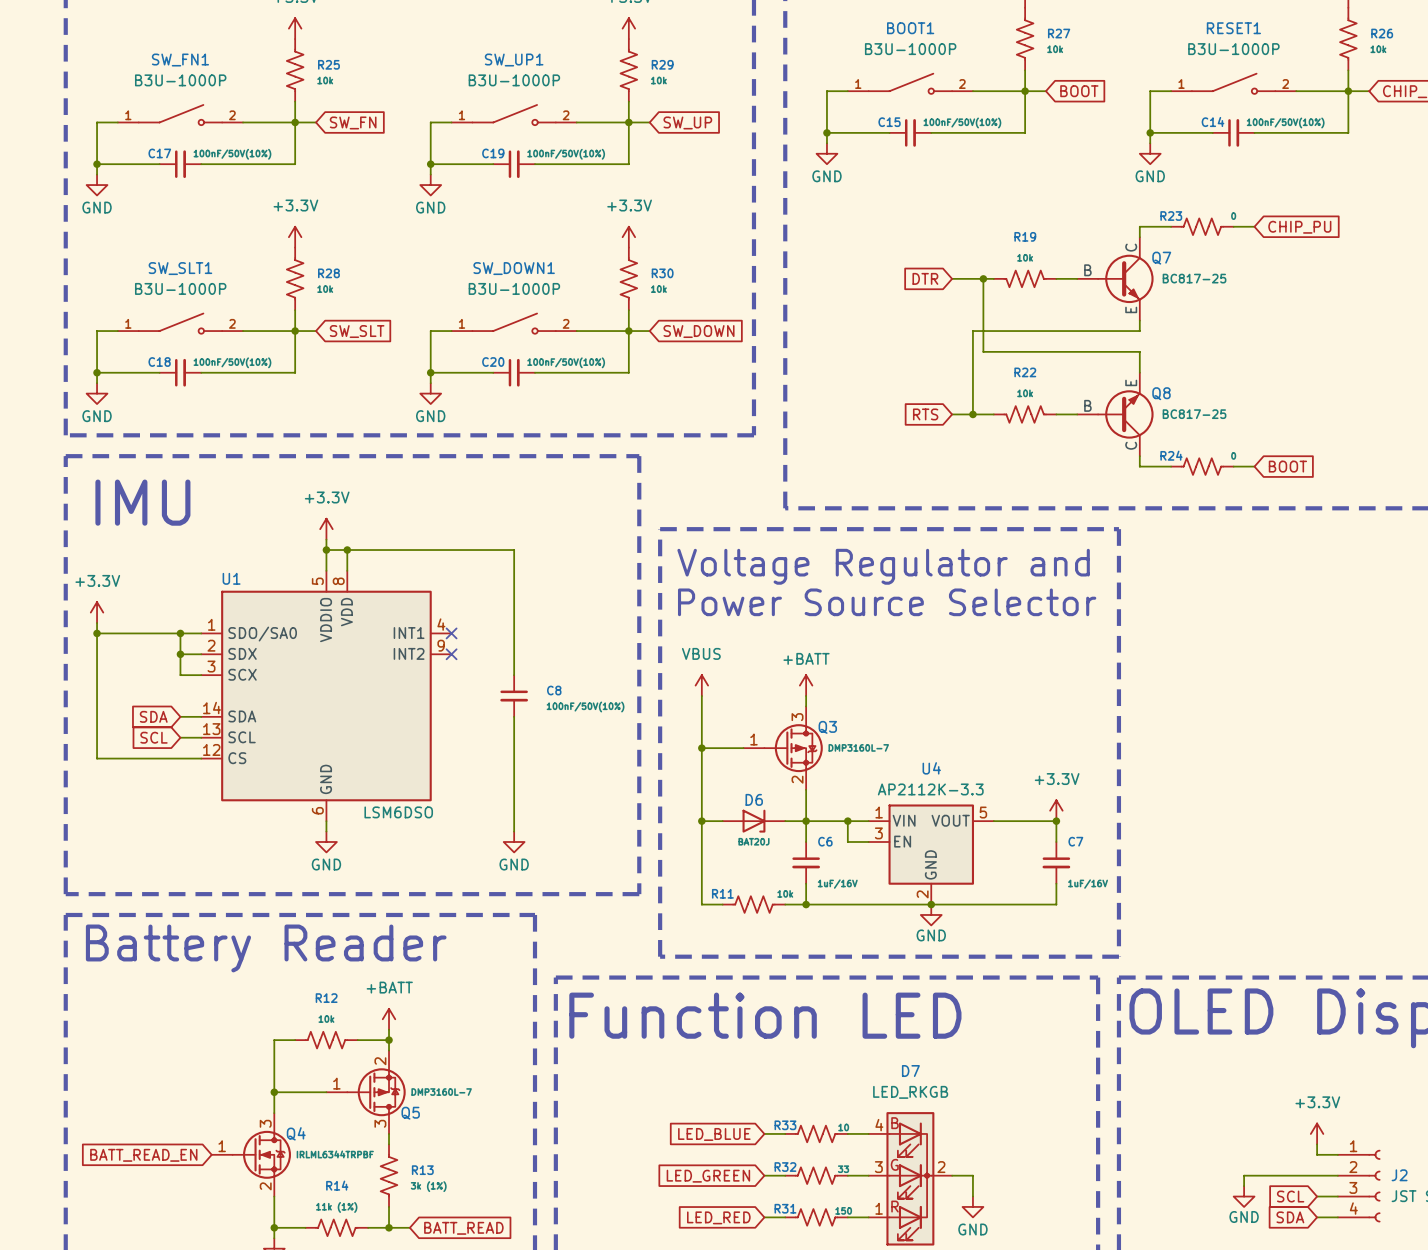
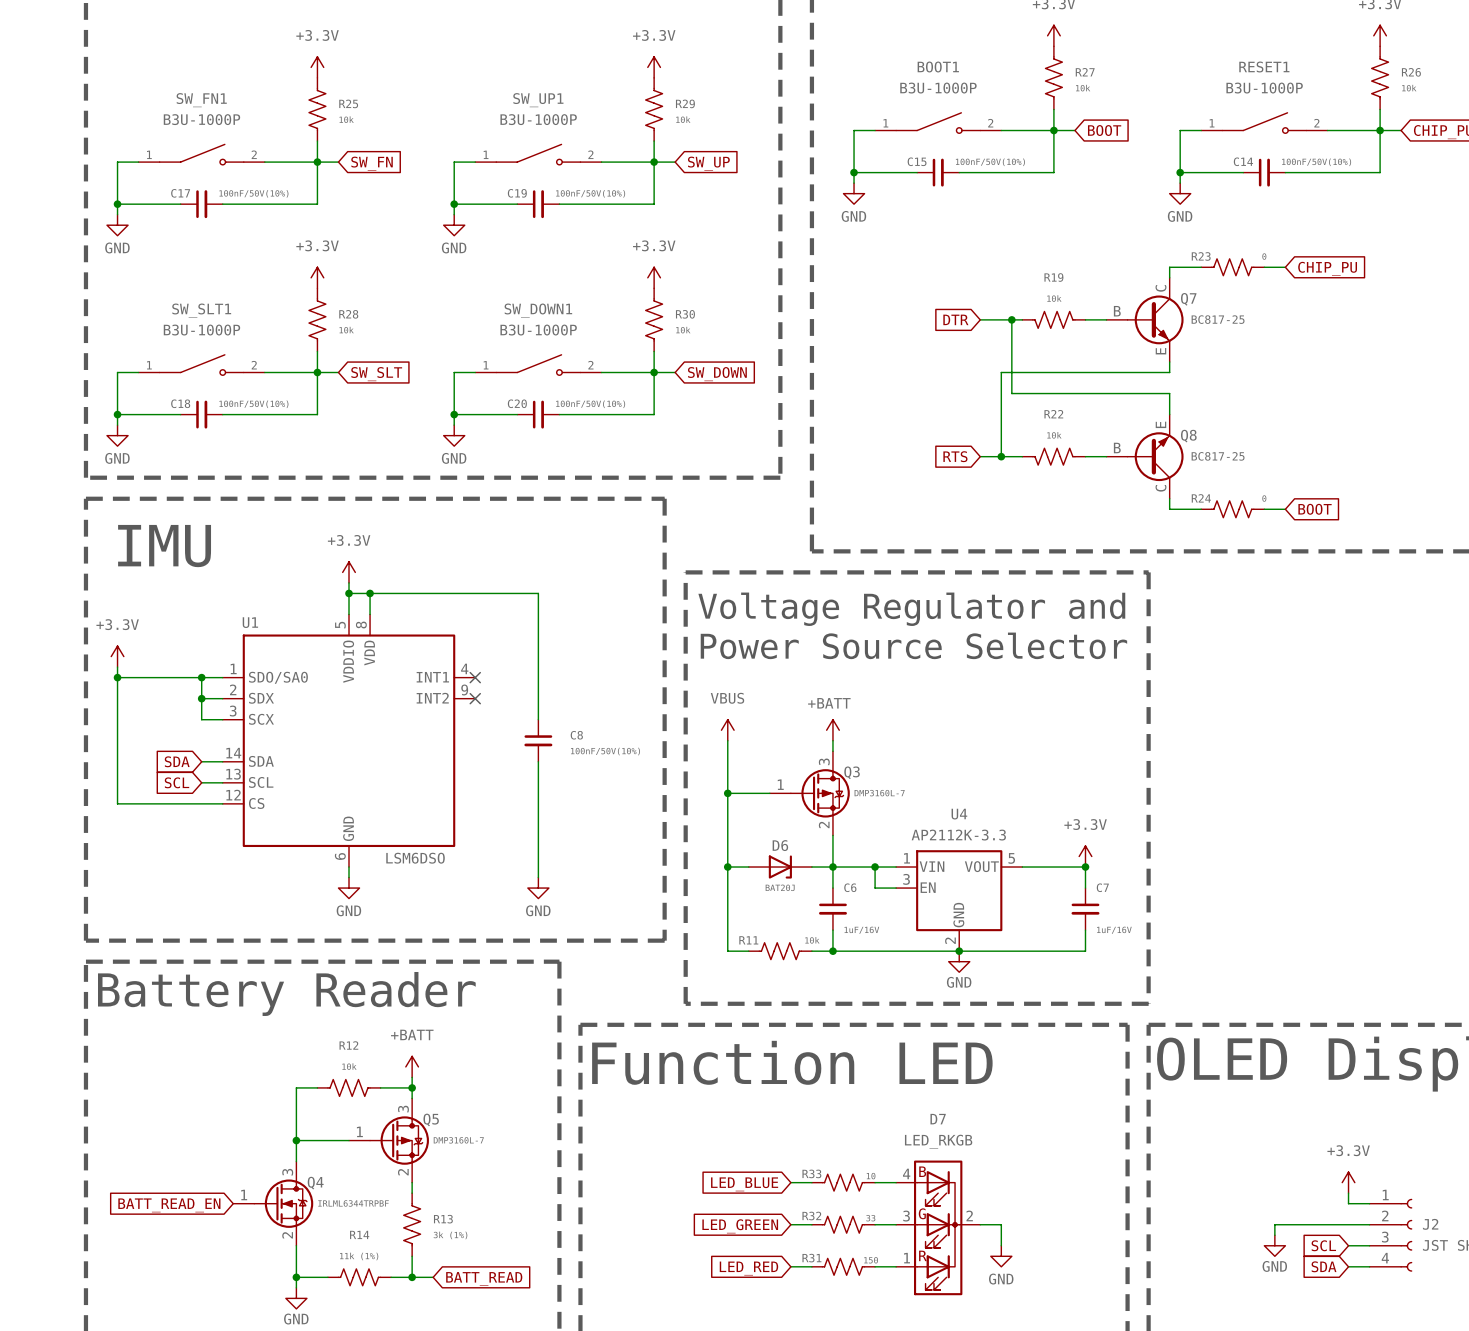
Q5 flip: as is (376, 1092) -> up-down (399, 1140)

